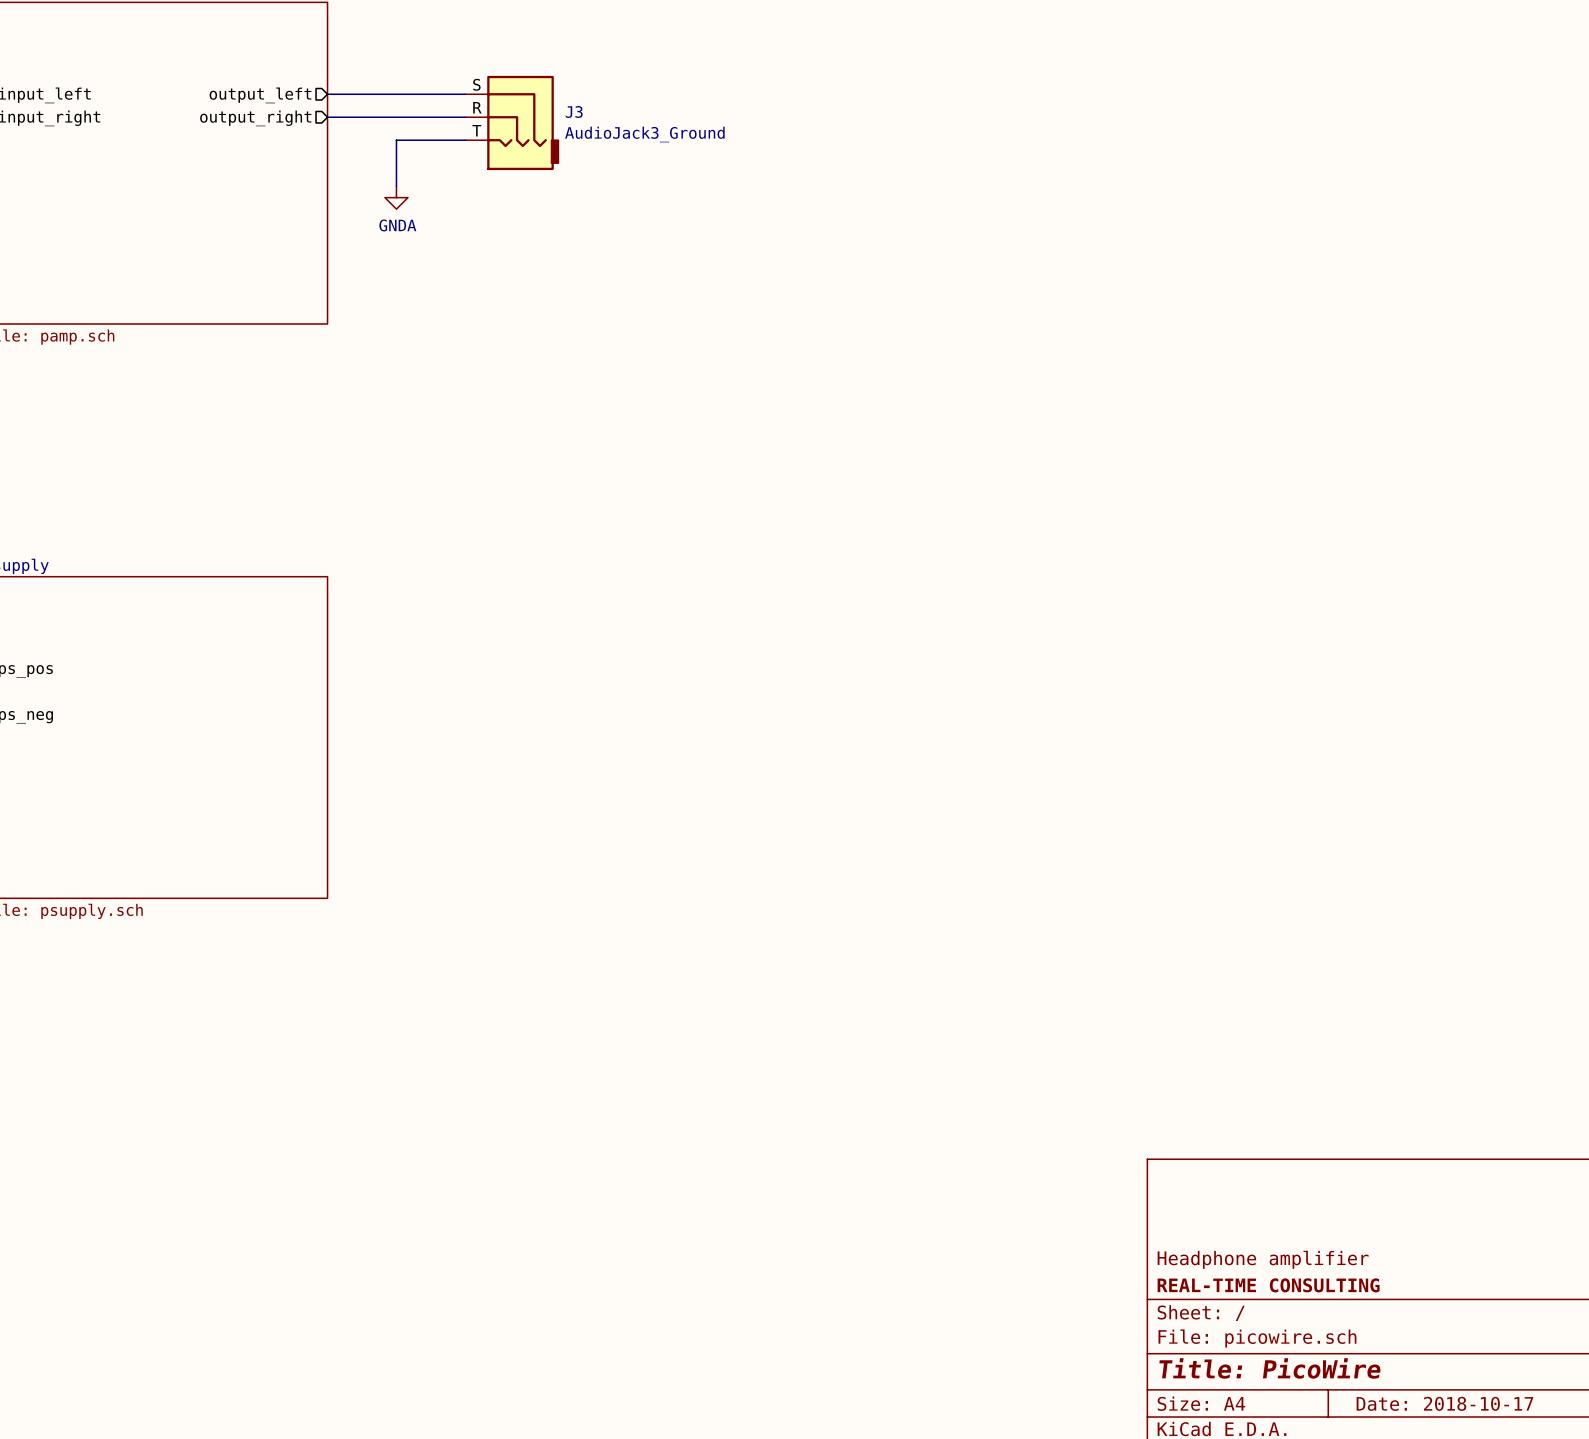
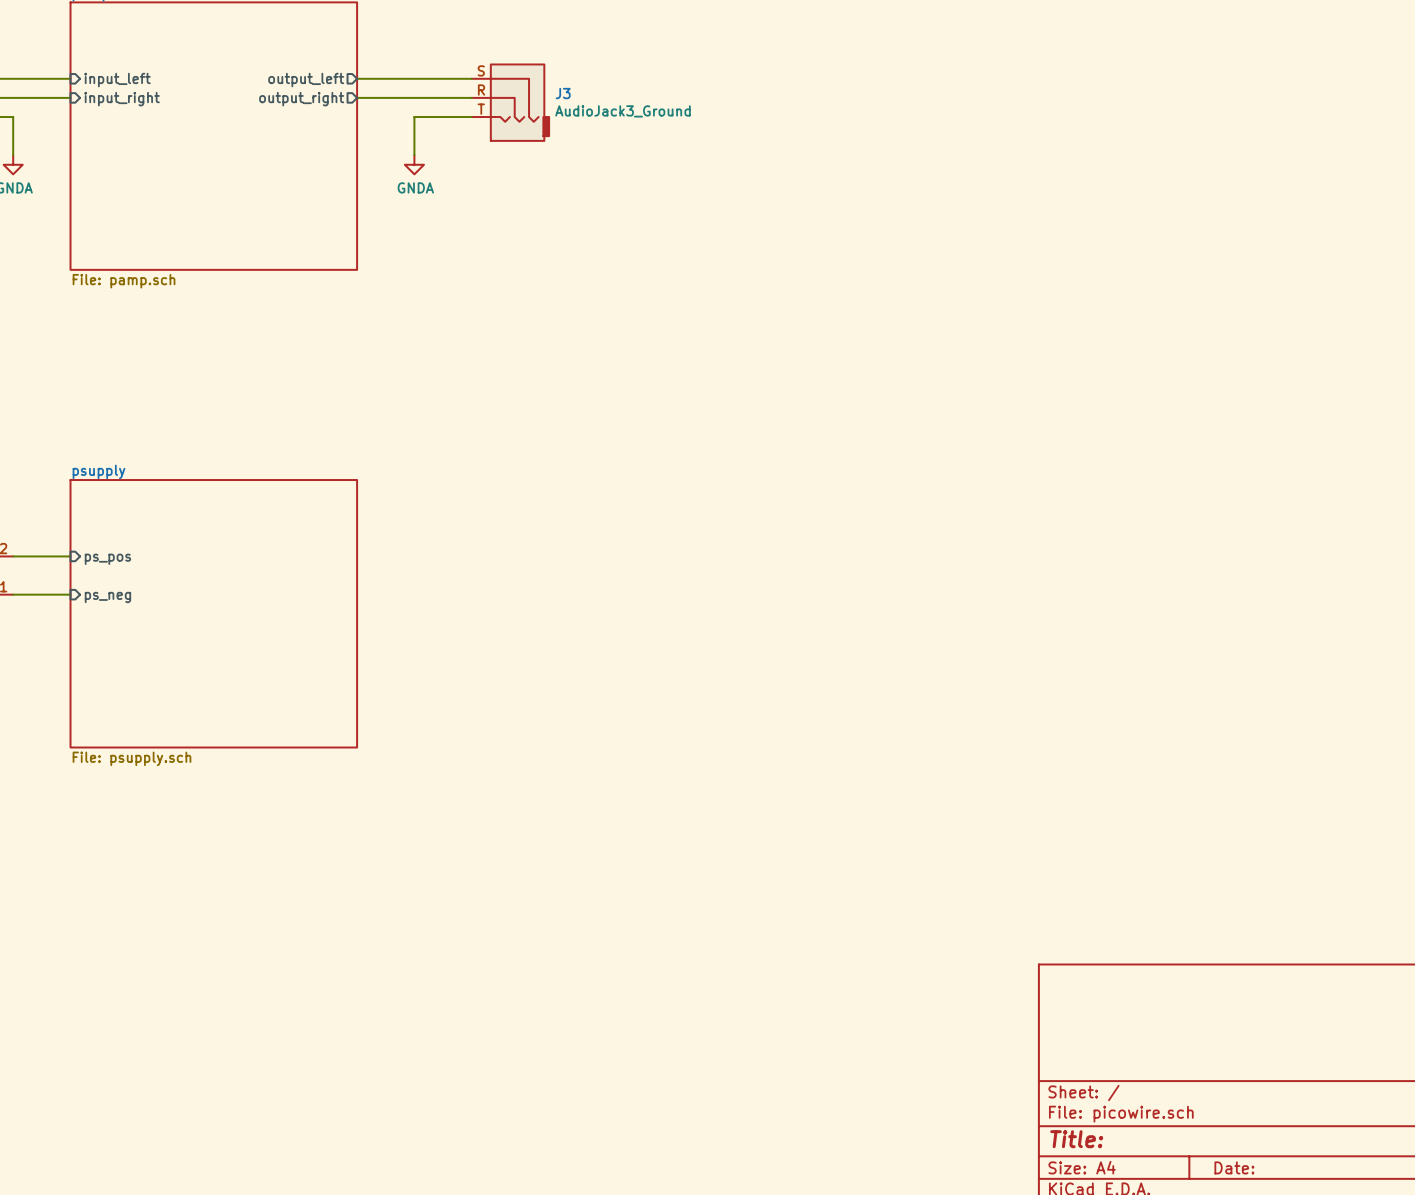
title block: Headphone amplifier (1263, 1259) -> none
title block: REAL-TIME CONSULTING (1268, 1285) -> none
title block: Title: PicoWire (1270, 1368) -> Title: (1076, 1139)
title block: Date: 2018-10-17 (1444, 1403) -> Date: (1234, 1167)

